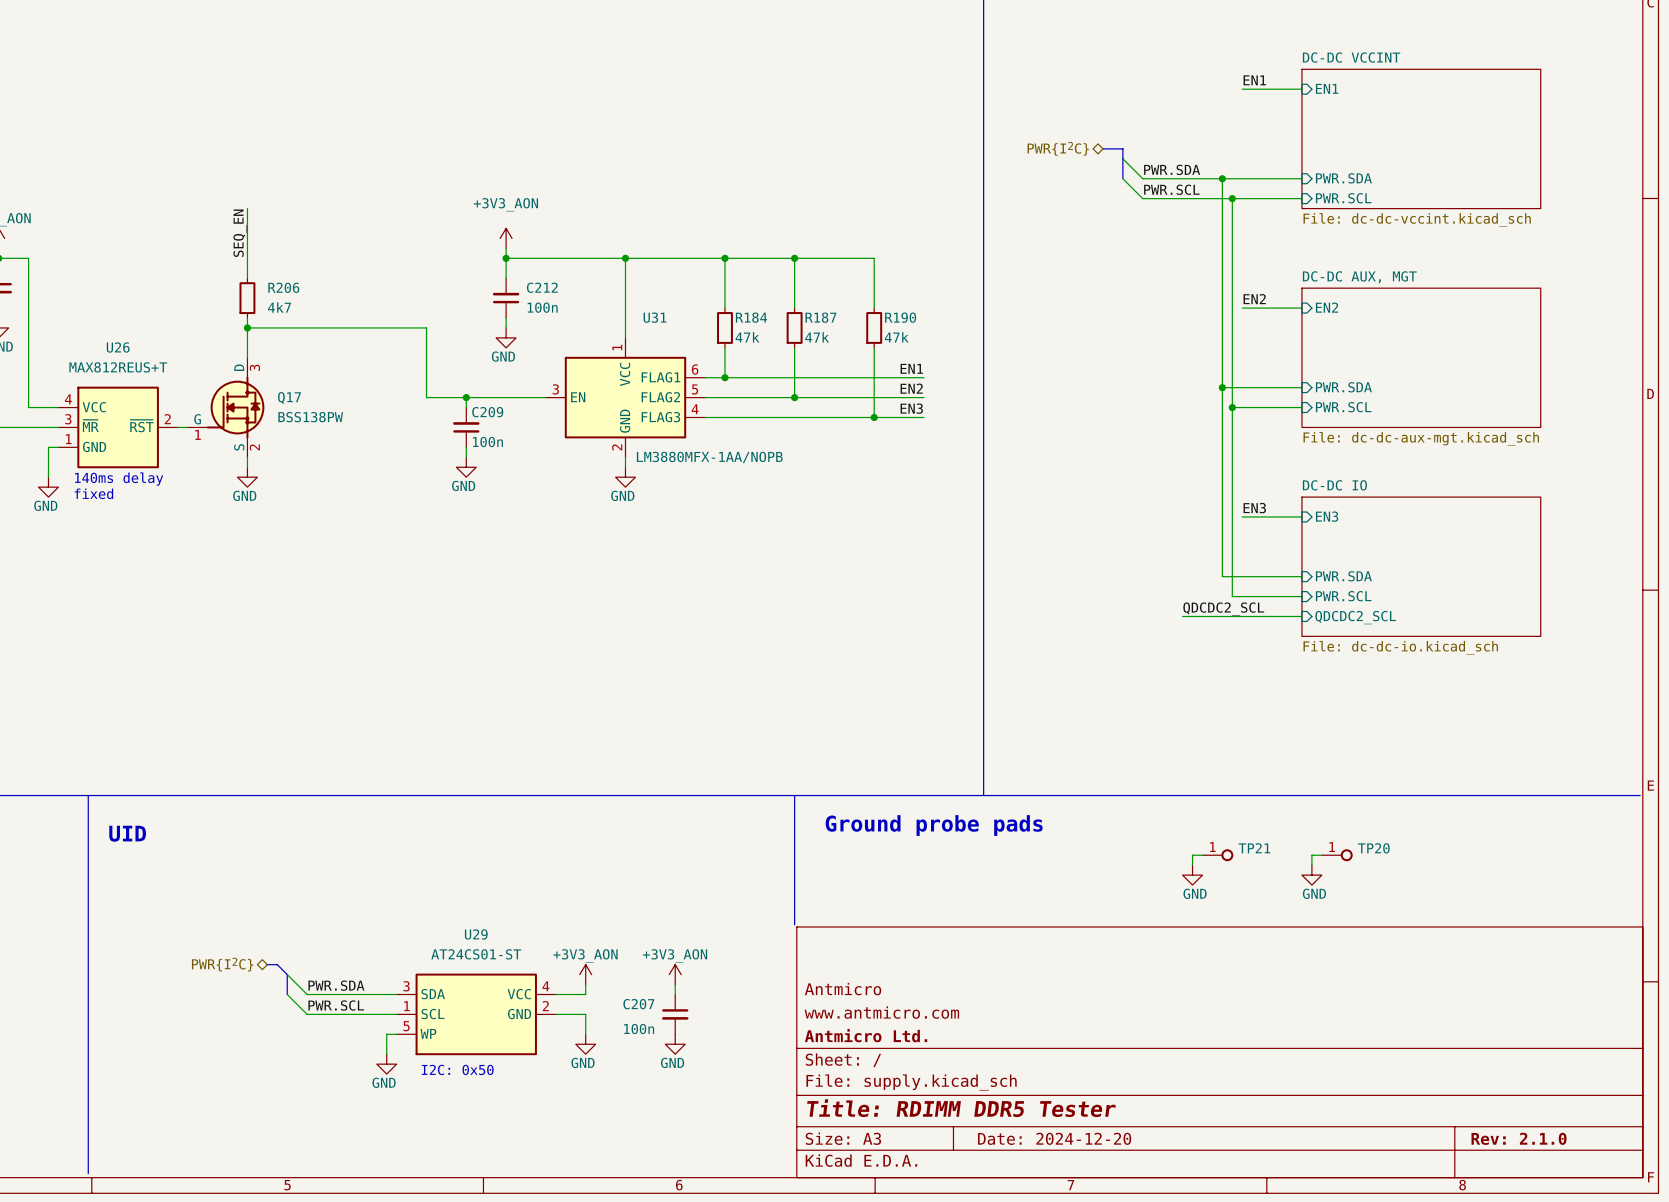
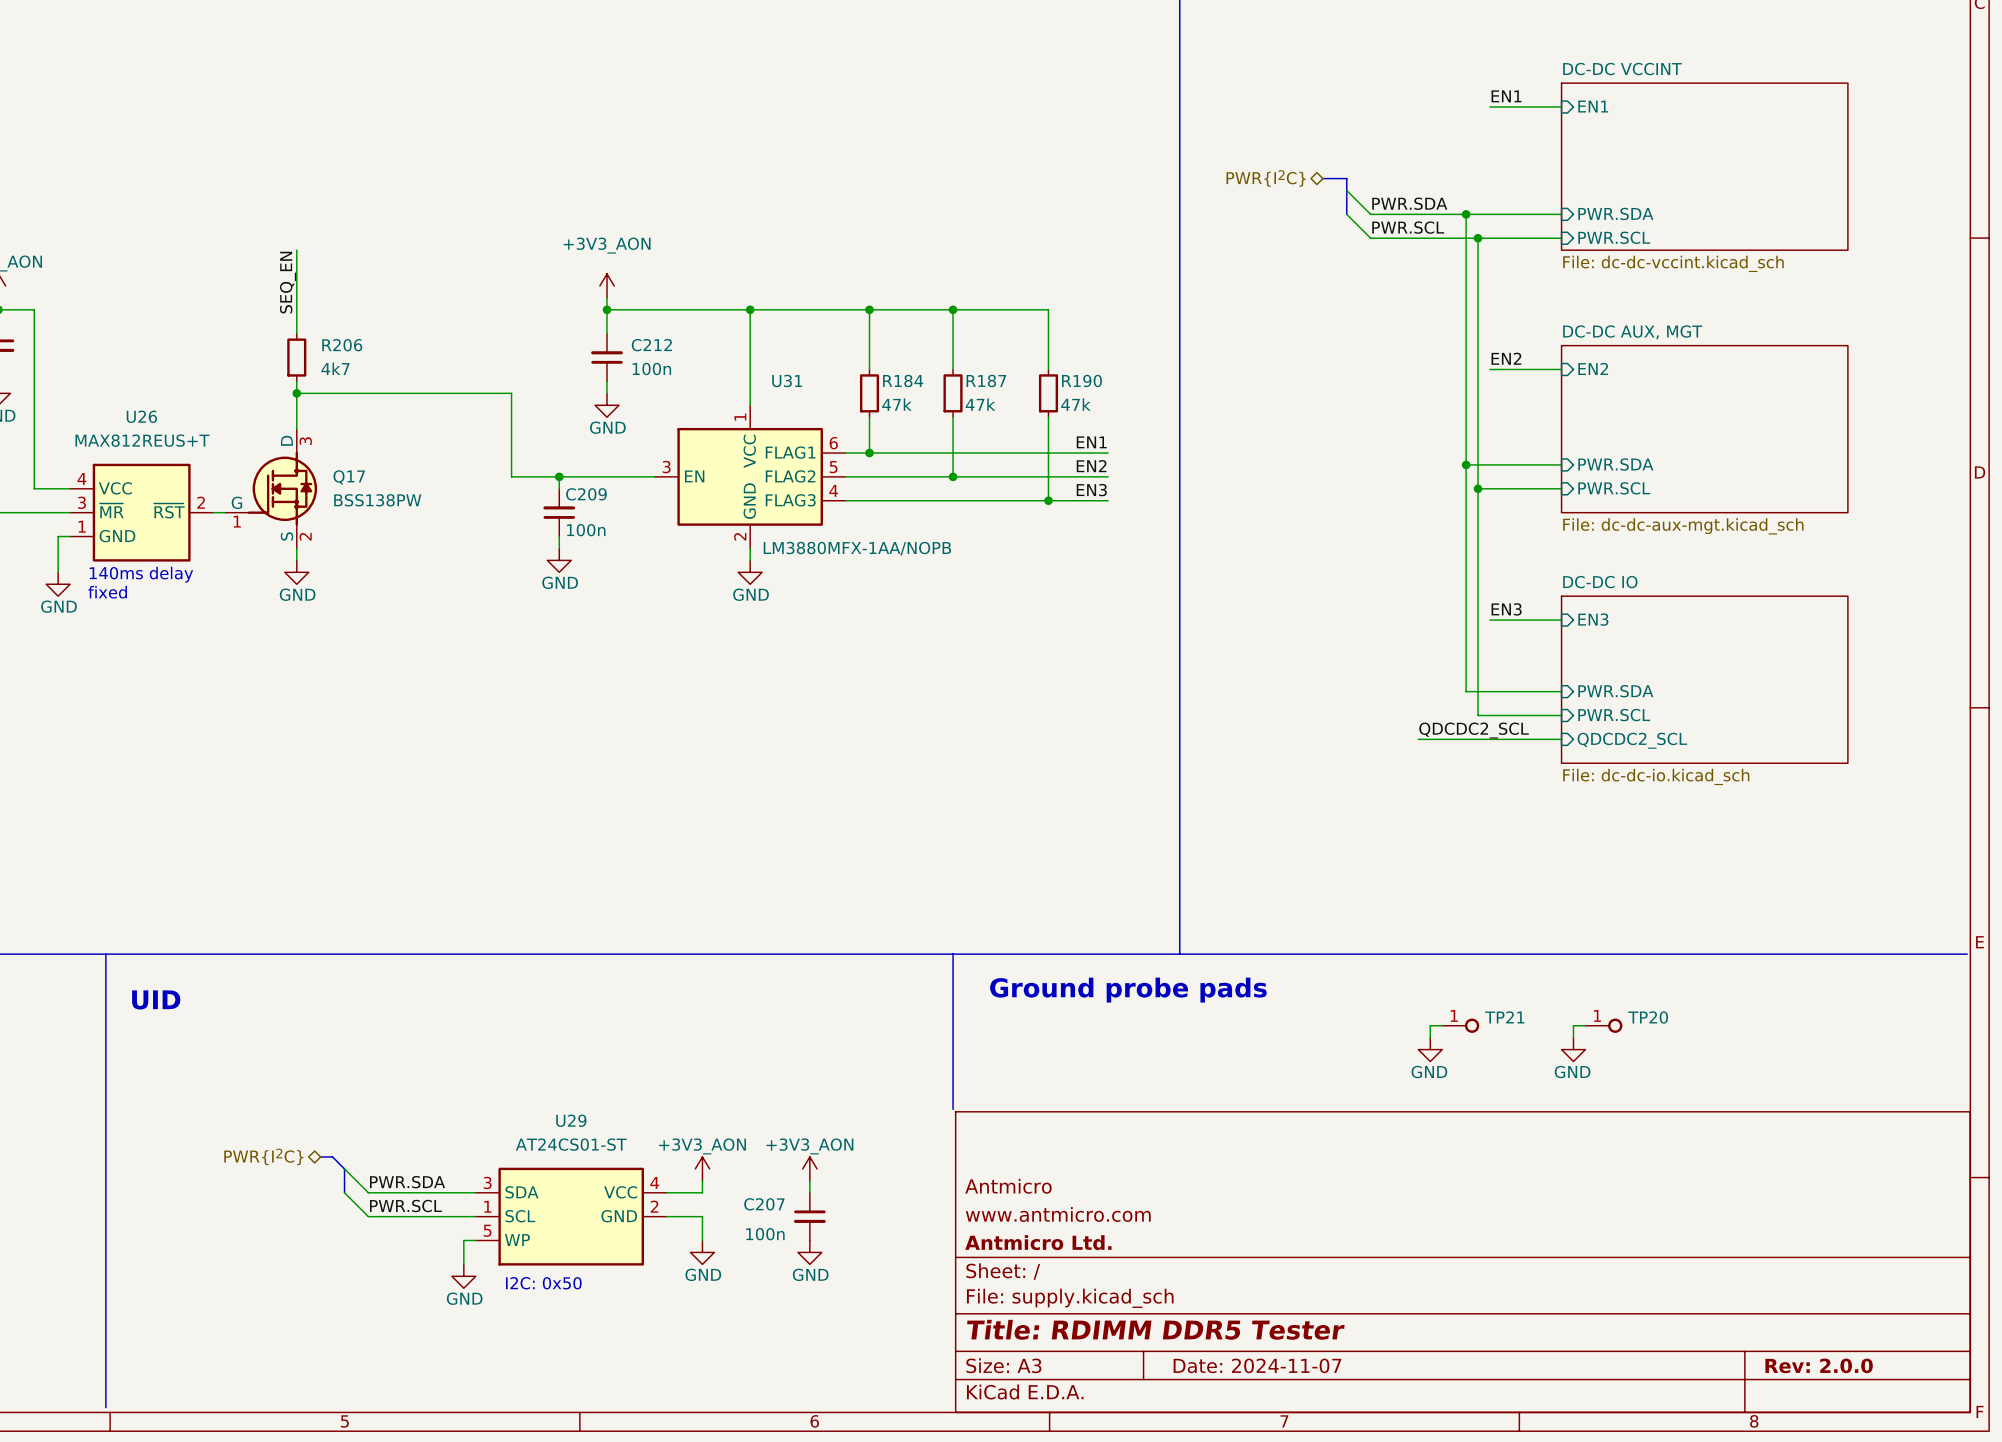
title block: Date: 2024-12-20 (1054, 1138) -> Date: 2024-11-07 (1257, 1365)
title block: Rev: 2.1.0 (1519, 1138) -> Rev: 2.0.0 (1819, 1365)

